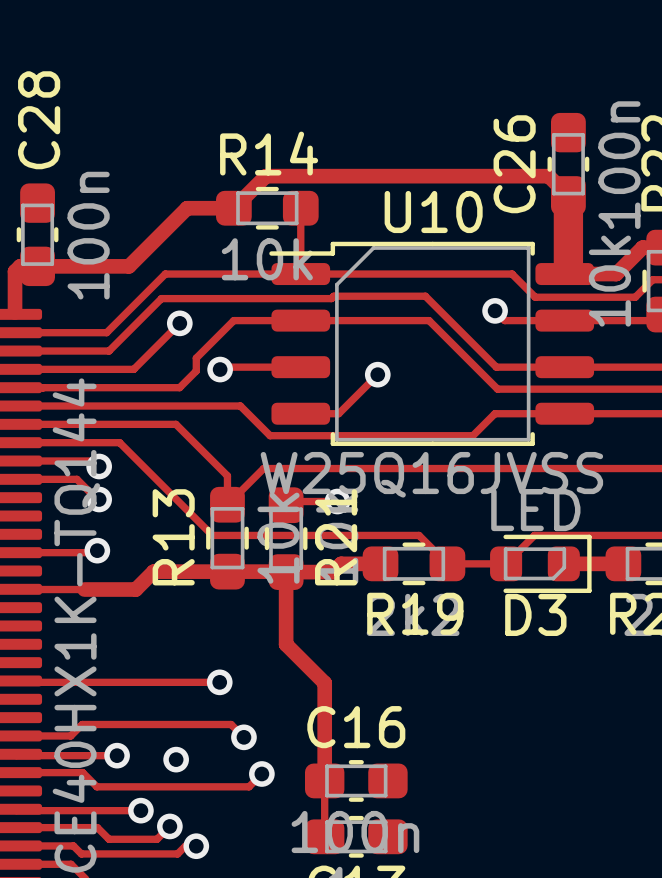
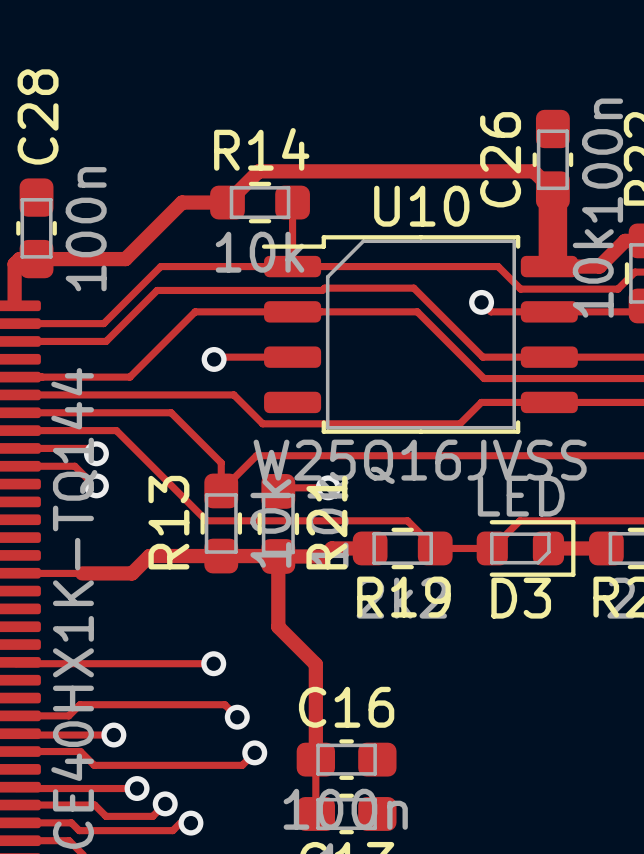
track: (233, 320) (196, 358) (196, 371) (179, 387) (133, 387) -> (227, 311) (195, 311) (129, 377)
track: (179, 323) (133, 369) (15, 369) -> none
via: (179, 323) -> none
track: (377, 374) (338, 413) (300, 413) -> none
via: (377, 374) -> none
track: (97, 550) (95, 552) (15, 552) -> none
via: (97, 550) -> none
via: (176, 759) -> none

